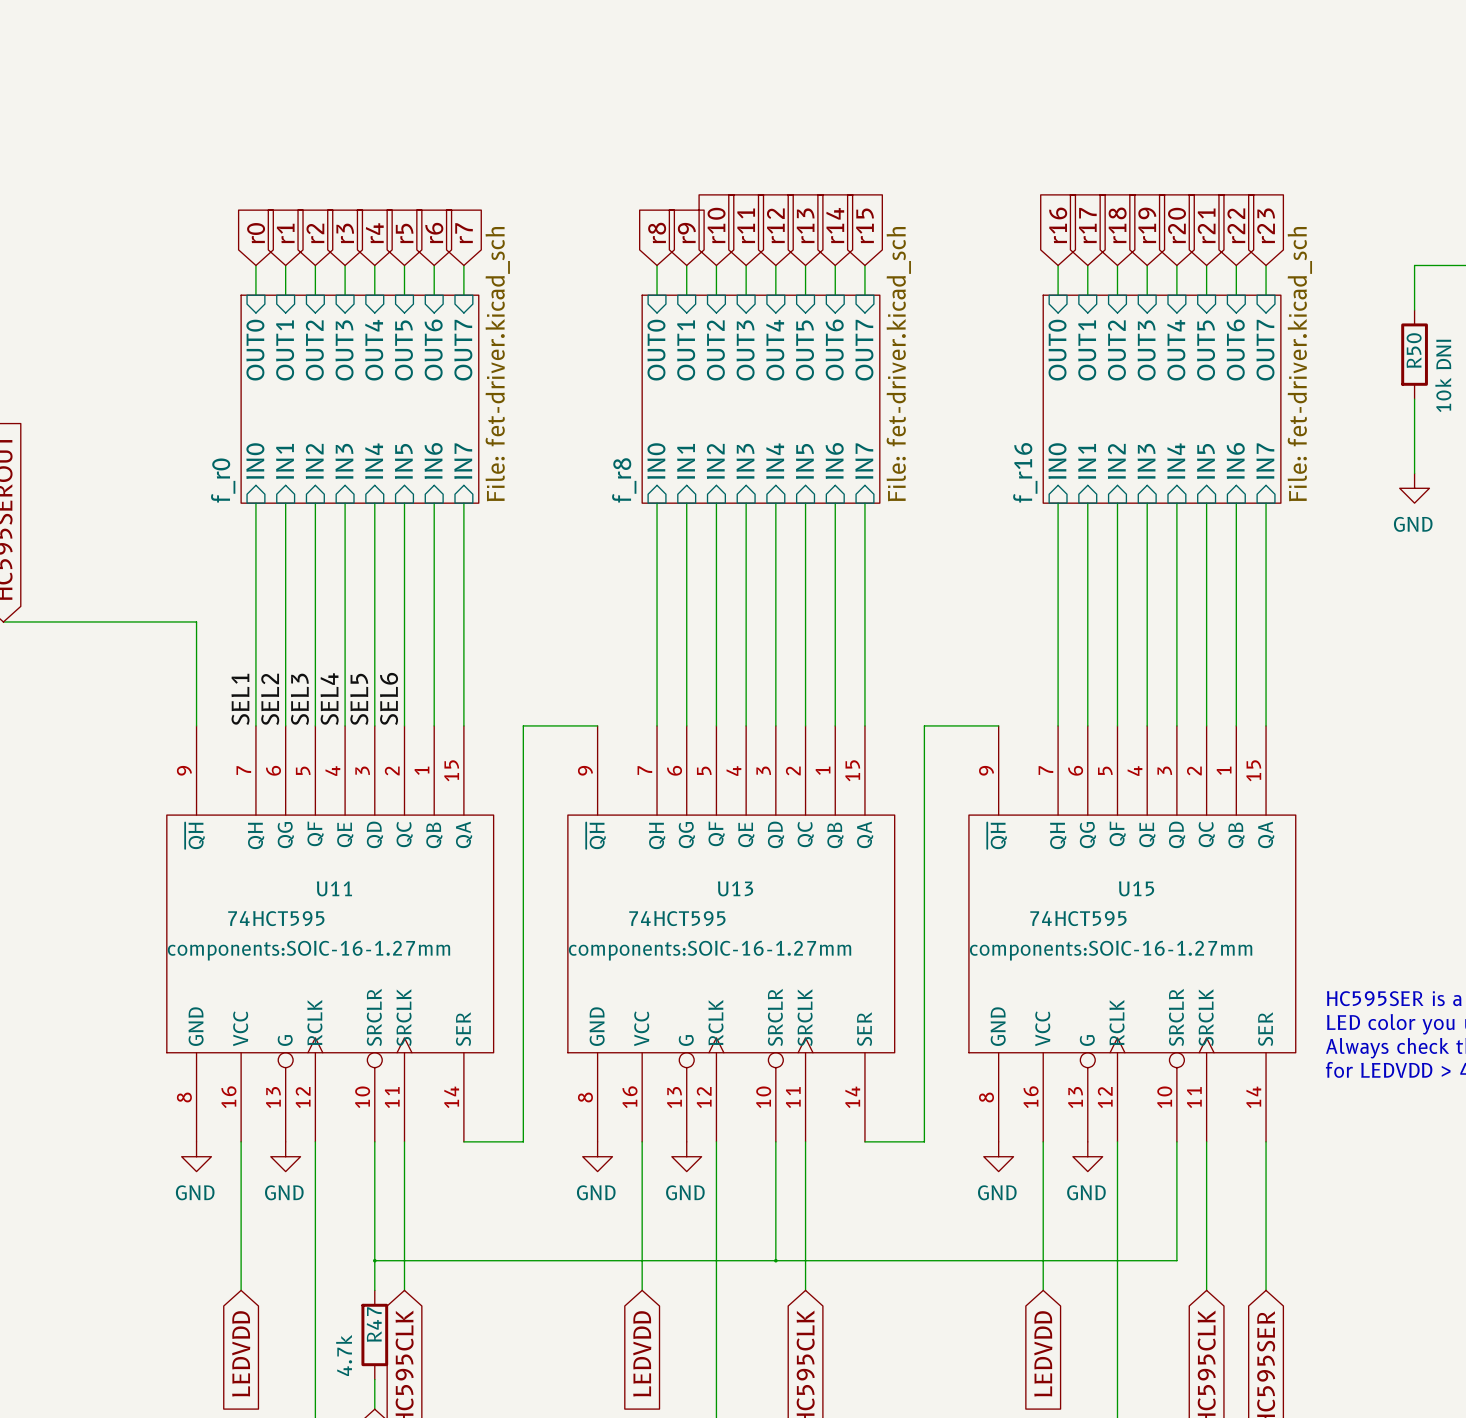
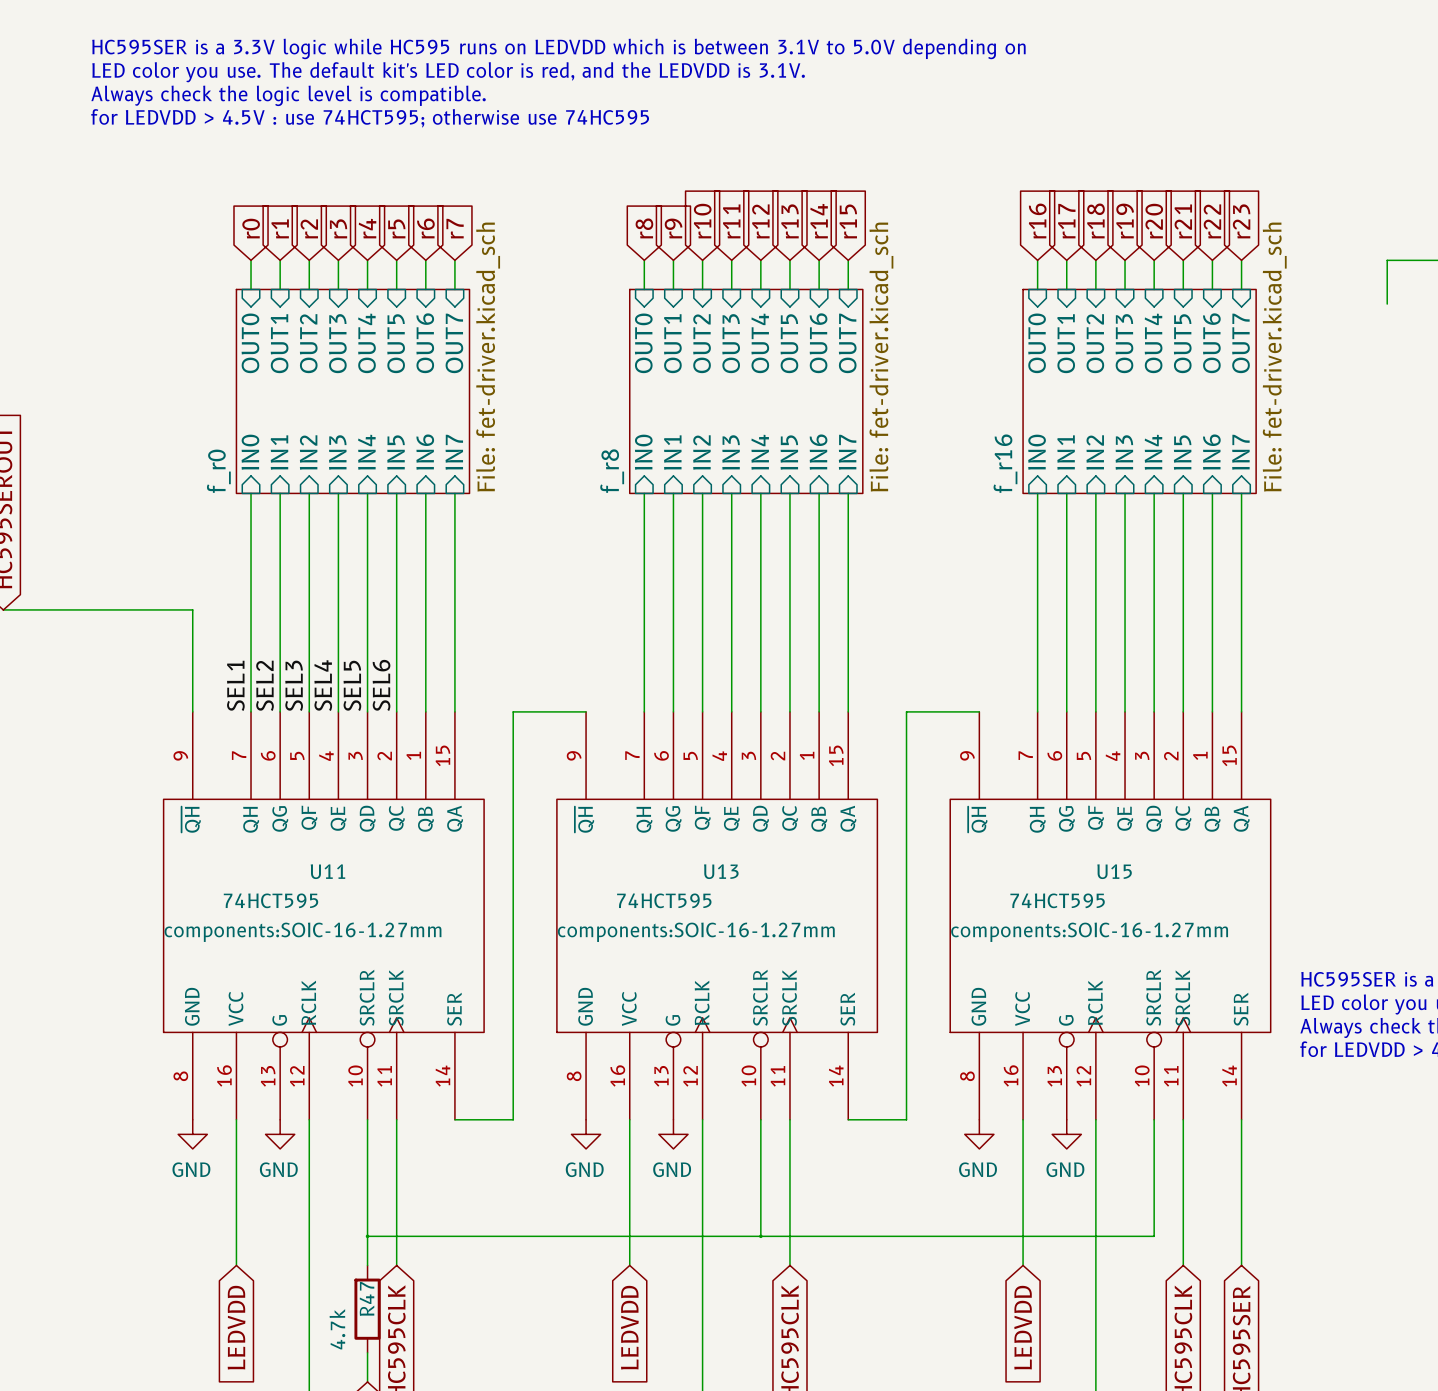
text: none -> HC595SER is a 3.3V logic while HC595 runs on LEDVDD which is between 3.1V to 5.0V depending on (558, 48)
text: none -> LED color you use. The default kit's LED color is red, and the LEDVDD is 3.1V. (448, 72)
text: none -> Always check the logic level is compatible. (288, 95)
text: none -> for LEDVDD > 4.5V : use 74HCT595; otherwise use 74HC595 (370, 118)
R50: 10k DNI (1414, 354) -> none
wire: (1414, 399) (1414, 473) -> none
power symbol: GND (1414, 488) -> none

